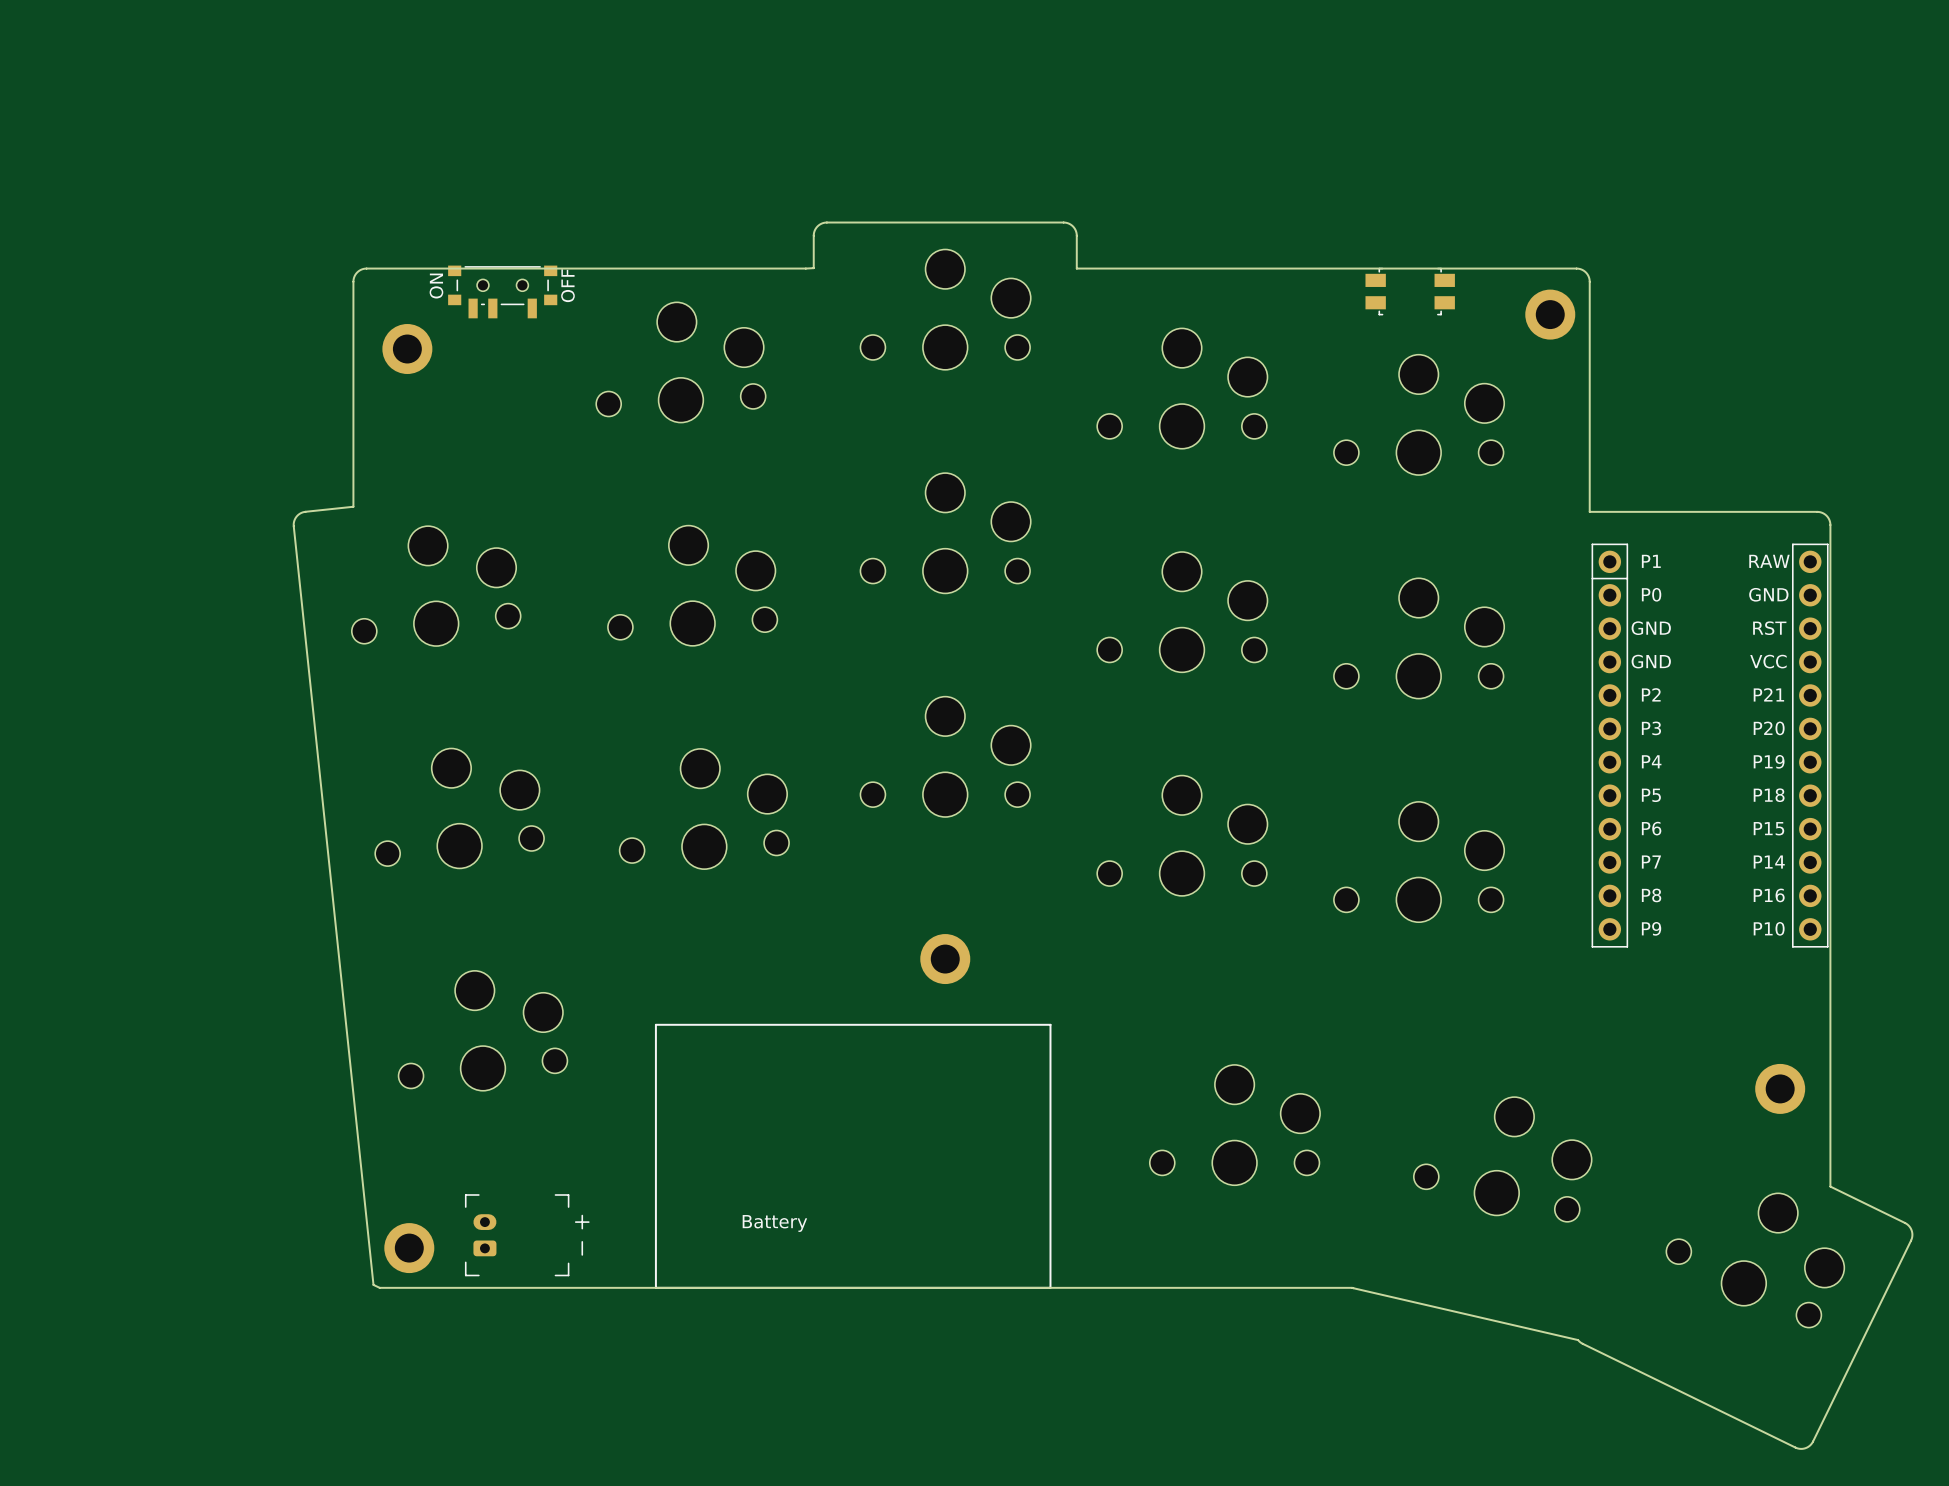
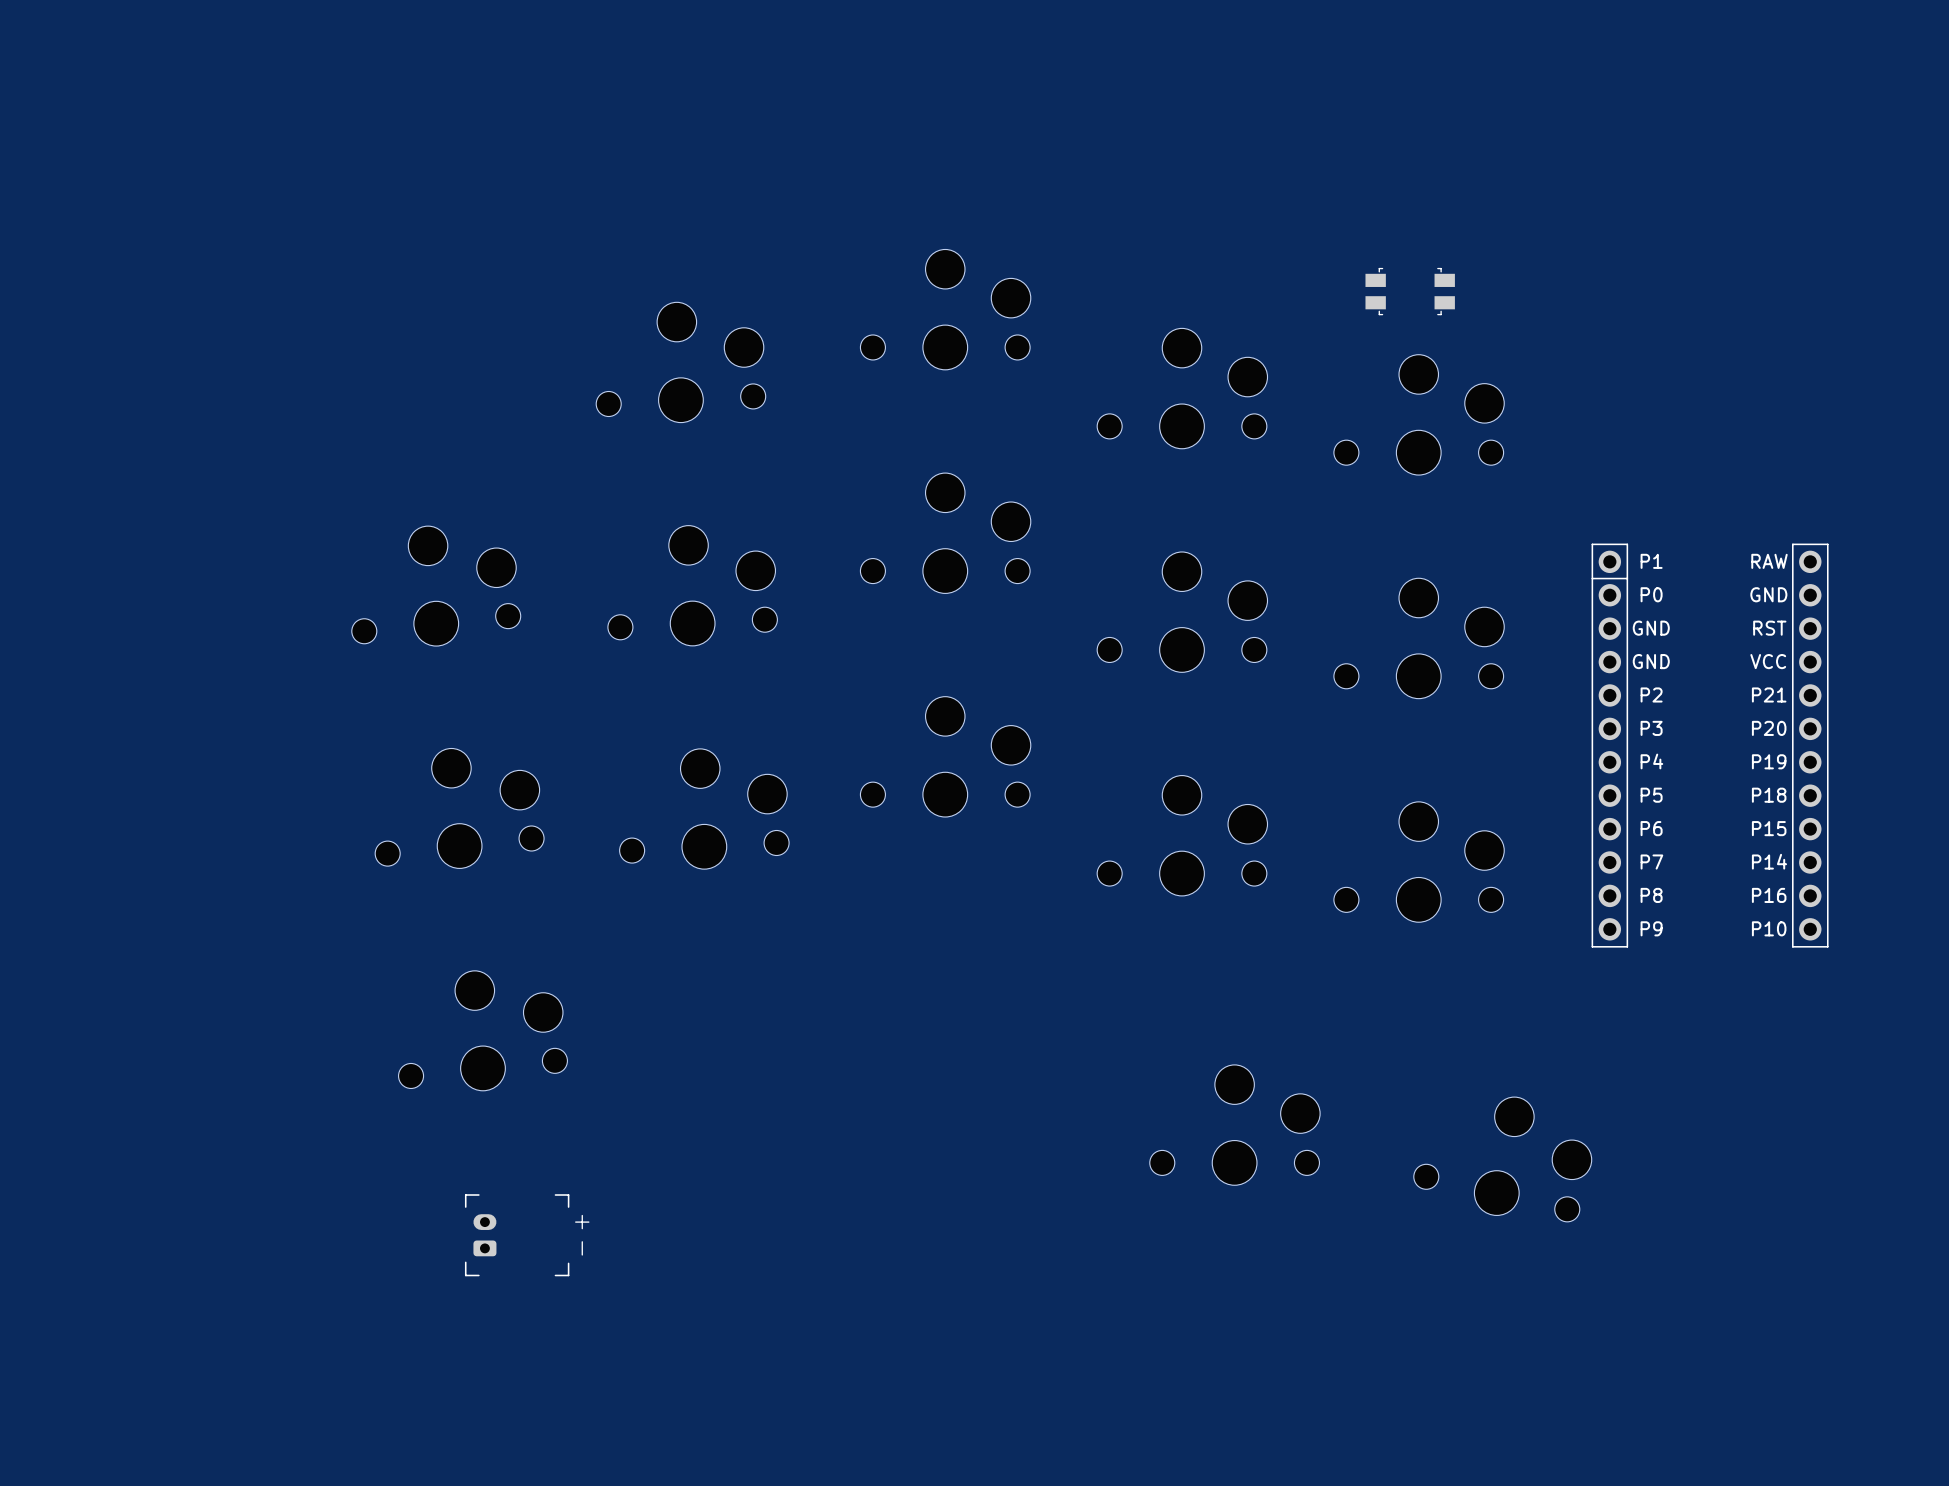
board edge: (826, 222) (1066, 222) (1072, 226) (1076, 232) (1076, 268) (1580, 269) (1586, 273) (1589, 281) (1589, 511) (1817, 511) (1827, 516) (1830, 525) (1830, 1186) (1906, 1223) (1910, 1227) (1912, 1234) (1809, 1446) (1802, 1448) (1795, 1447) (1578, 1340) (1352, 1287) (379, 1287) (373, 1284) (293, 524) (295, 517) (302, 512) (353, 506) (354, 276) (359, 270) (366, 268) (813, 268) (814, 231) (818, 225) (826, 222) -> none
part: (502, 291) -> none
part: (1550, 314) -> none
part: (407, 349) -> none
part: (945, 959) -> none
line: (655, 1024) (655, 1287) (1050, 1287) (1050, 1024) (655, 1024) -> none
part: (1780, 1088) -> none
text: Battery (774, 1223) -> none
part: (409, 1248) -> none
part: (1755, 1260) -> none

